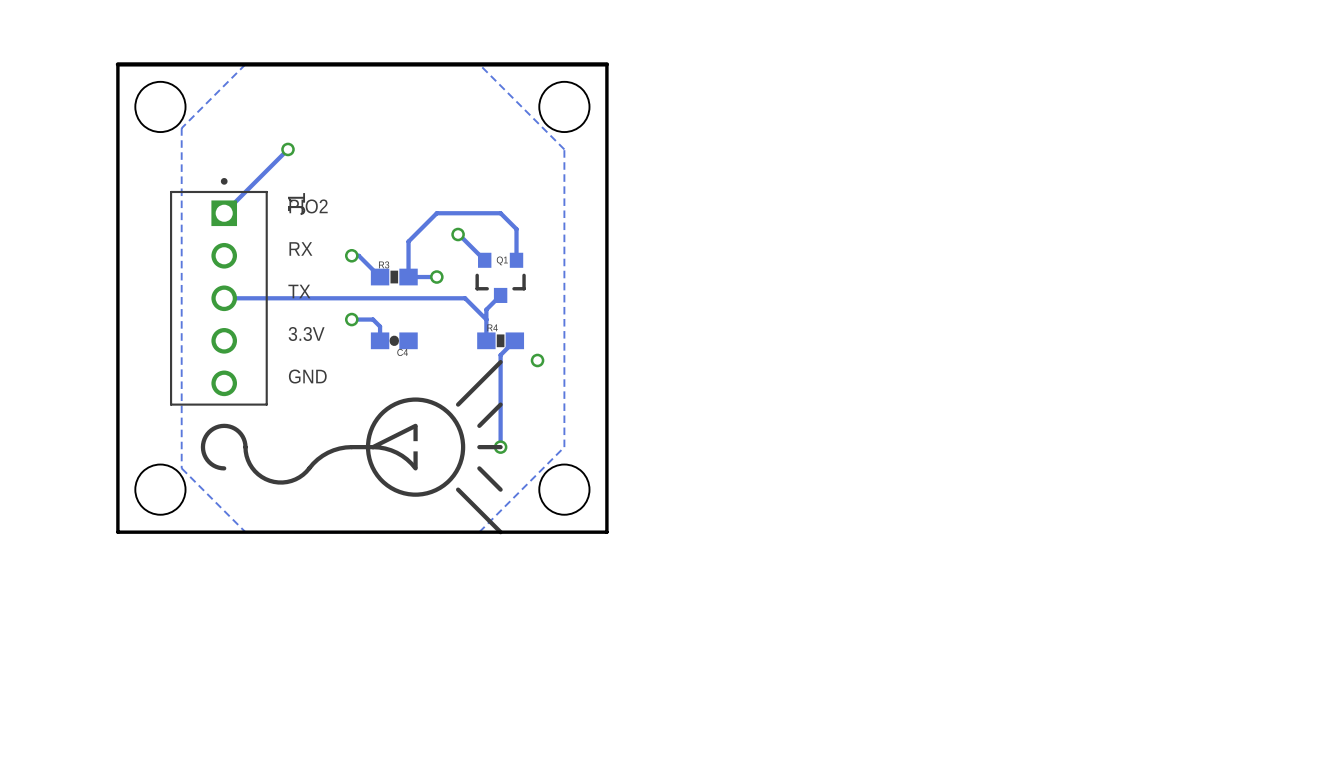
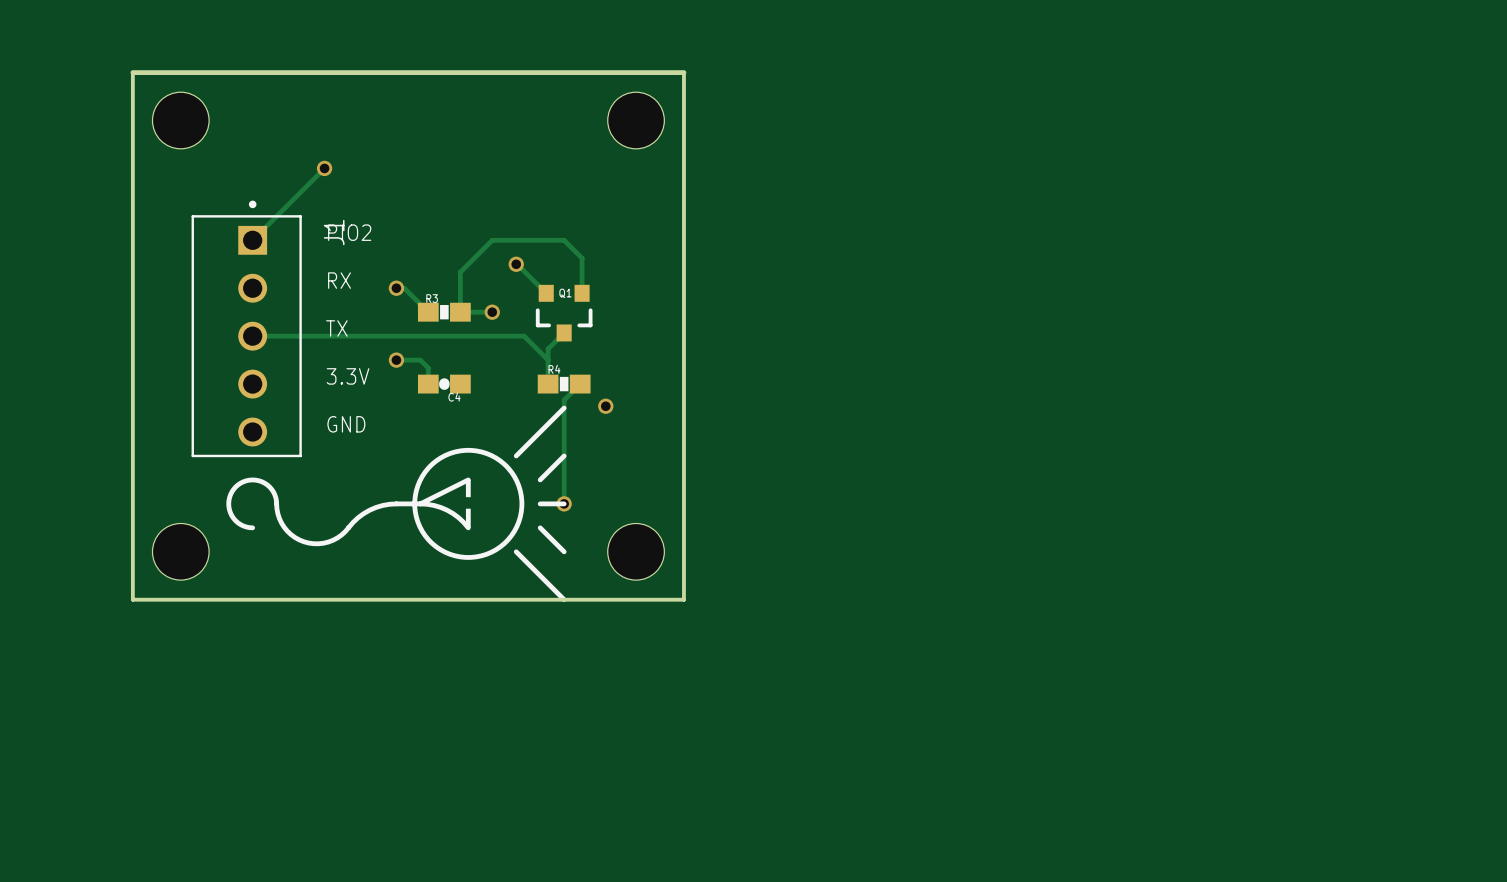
zone outline: (479, 64) (564, 149) (564, 447) (479, 532) (245, 532) (181, 468) (181, 128) (245, 64) (479, 64) -> none

